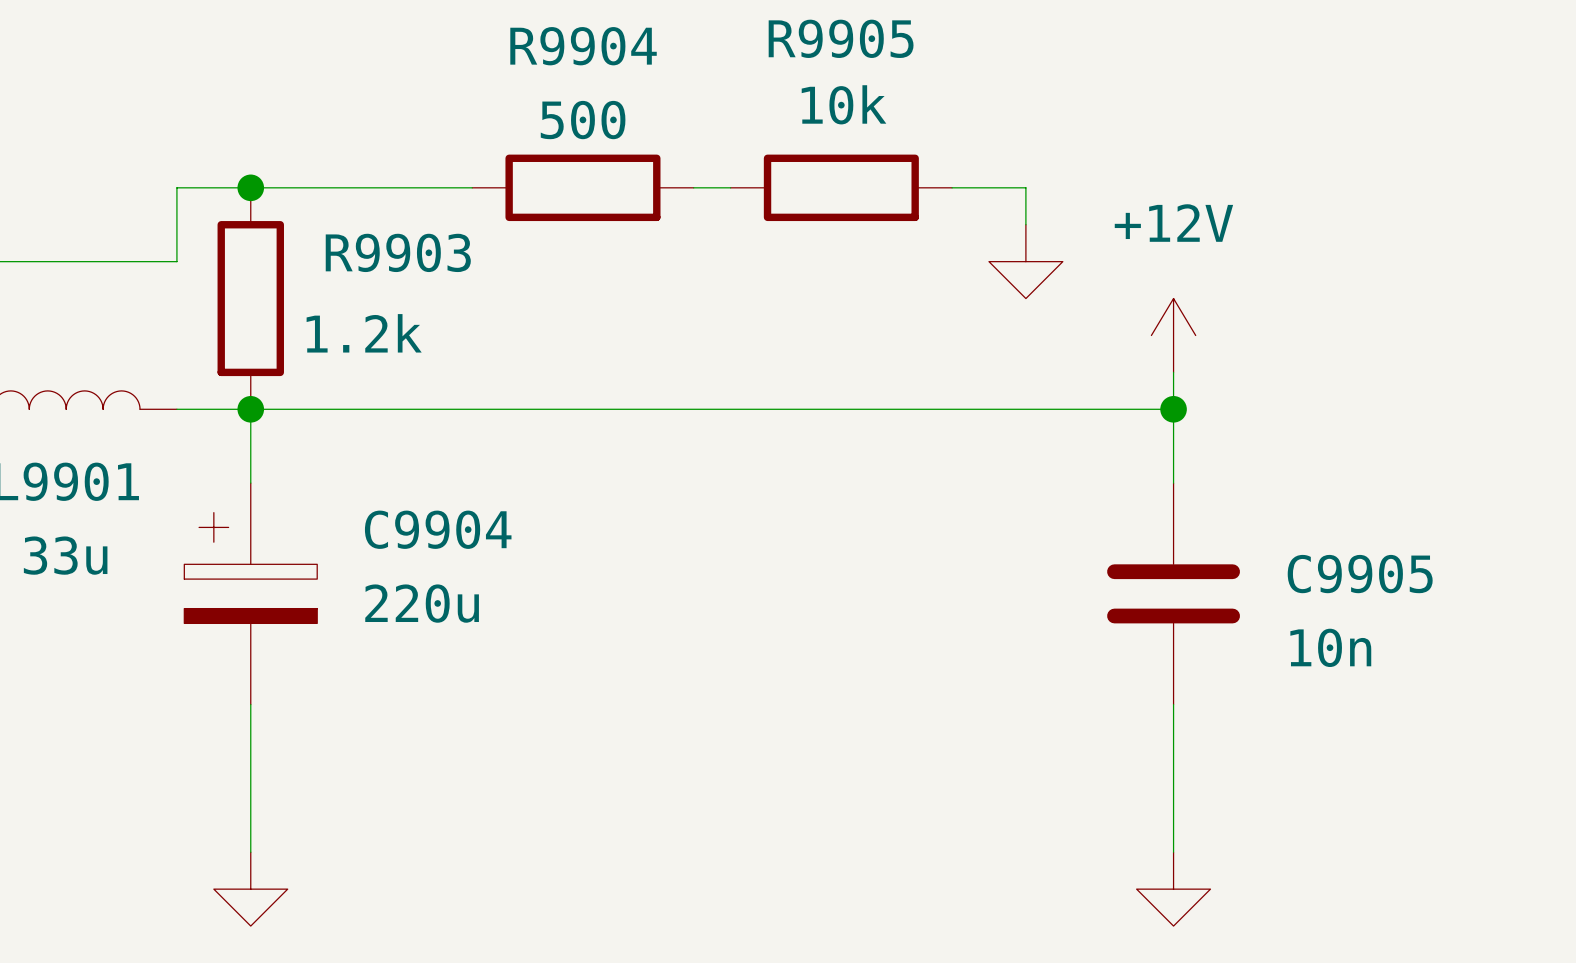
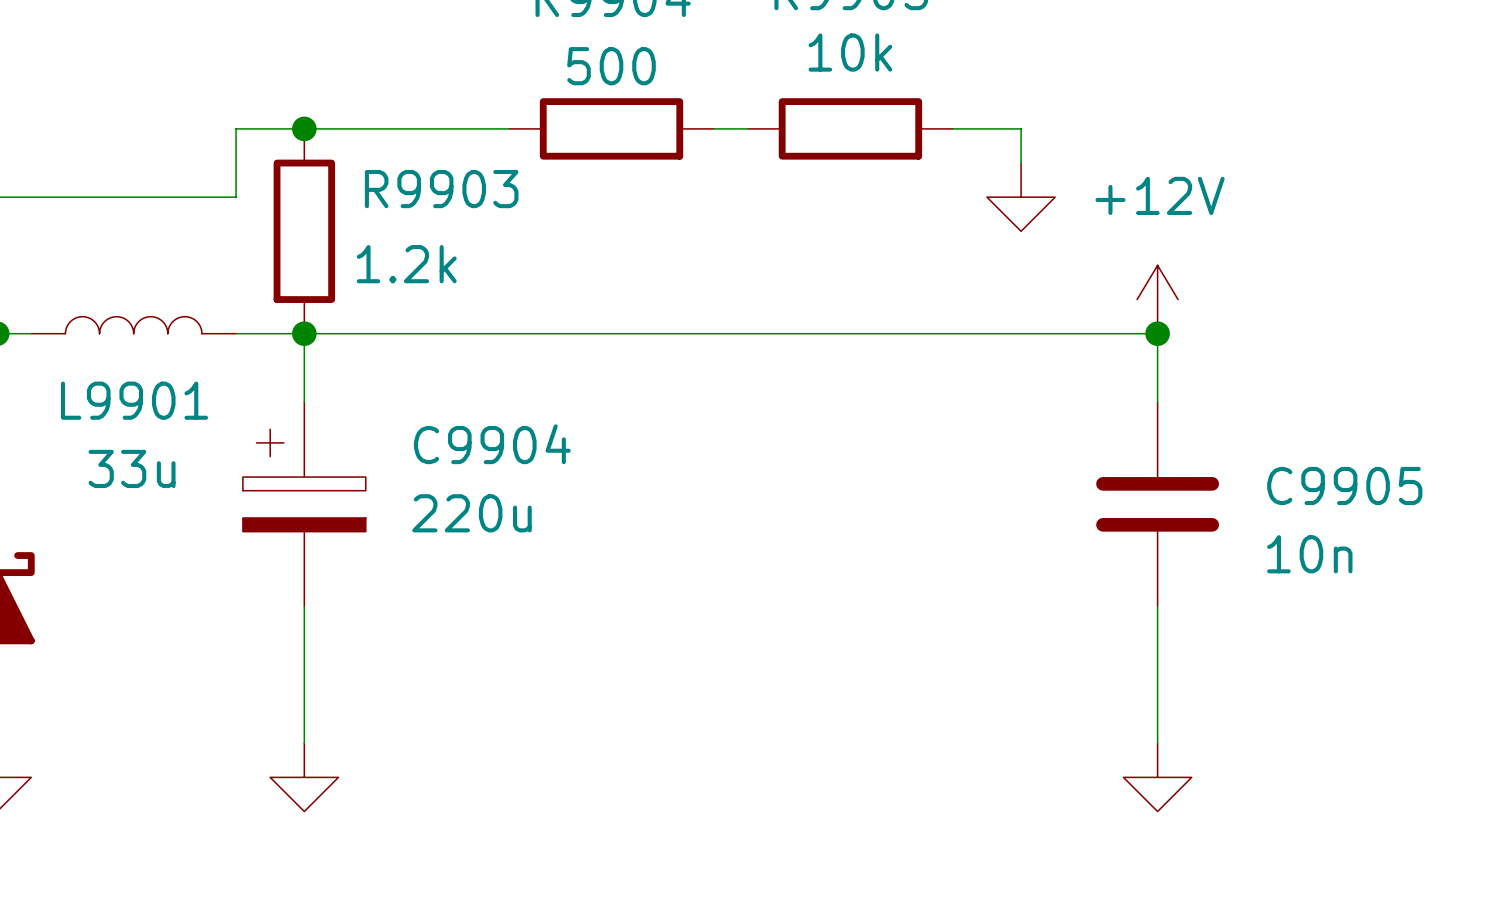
power symbol position: +12V (1173, 335) -> +12V (1157, 299)

